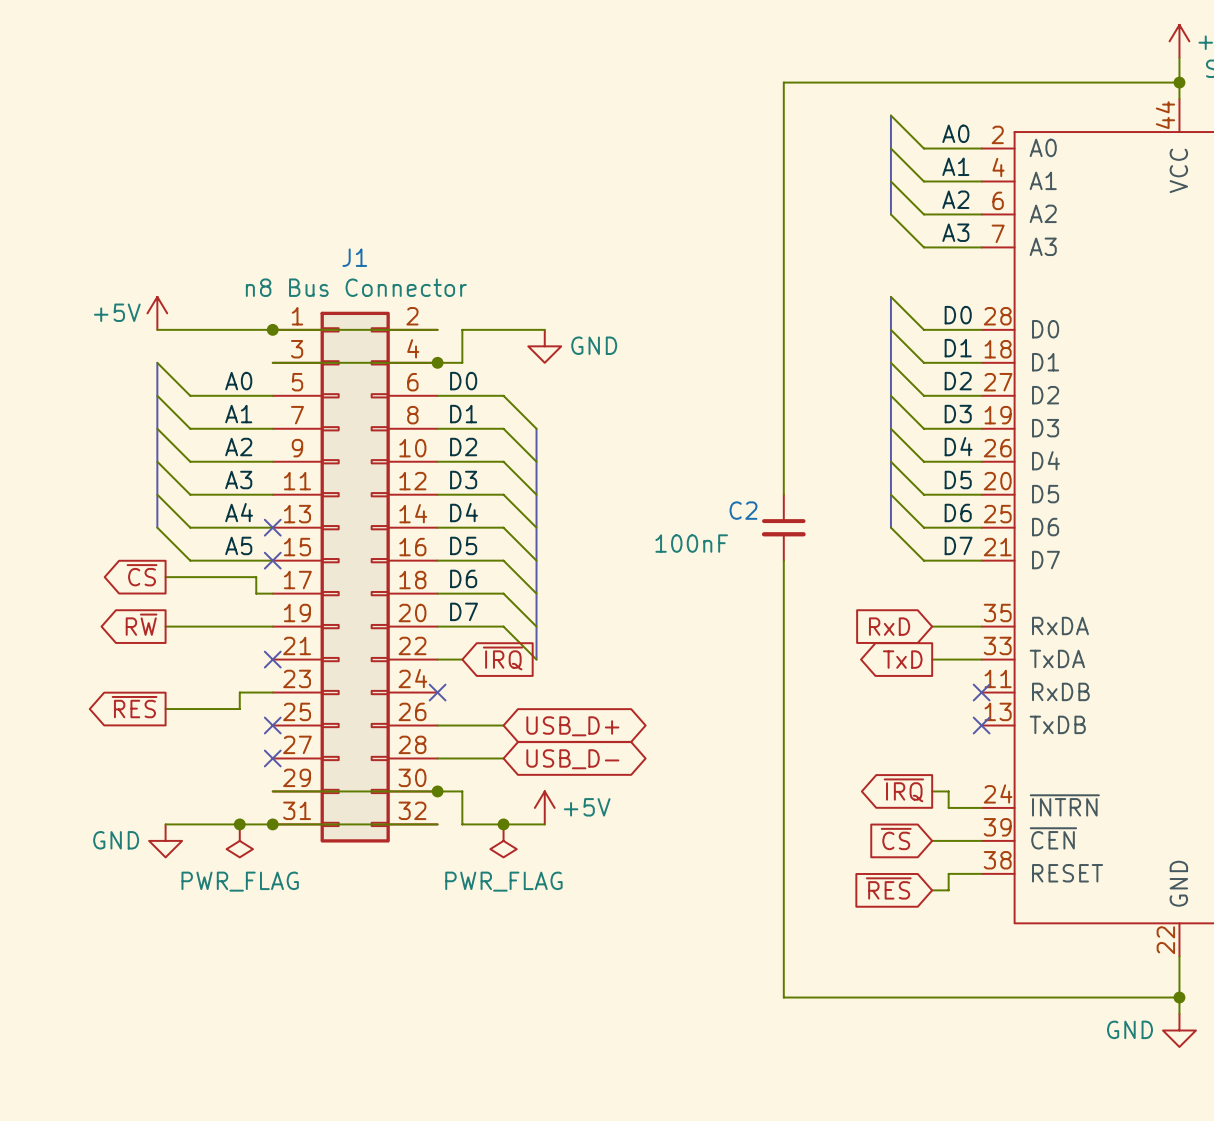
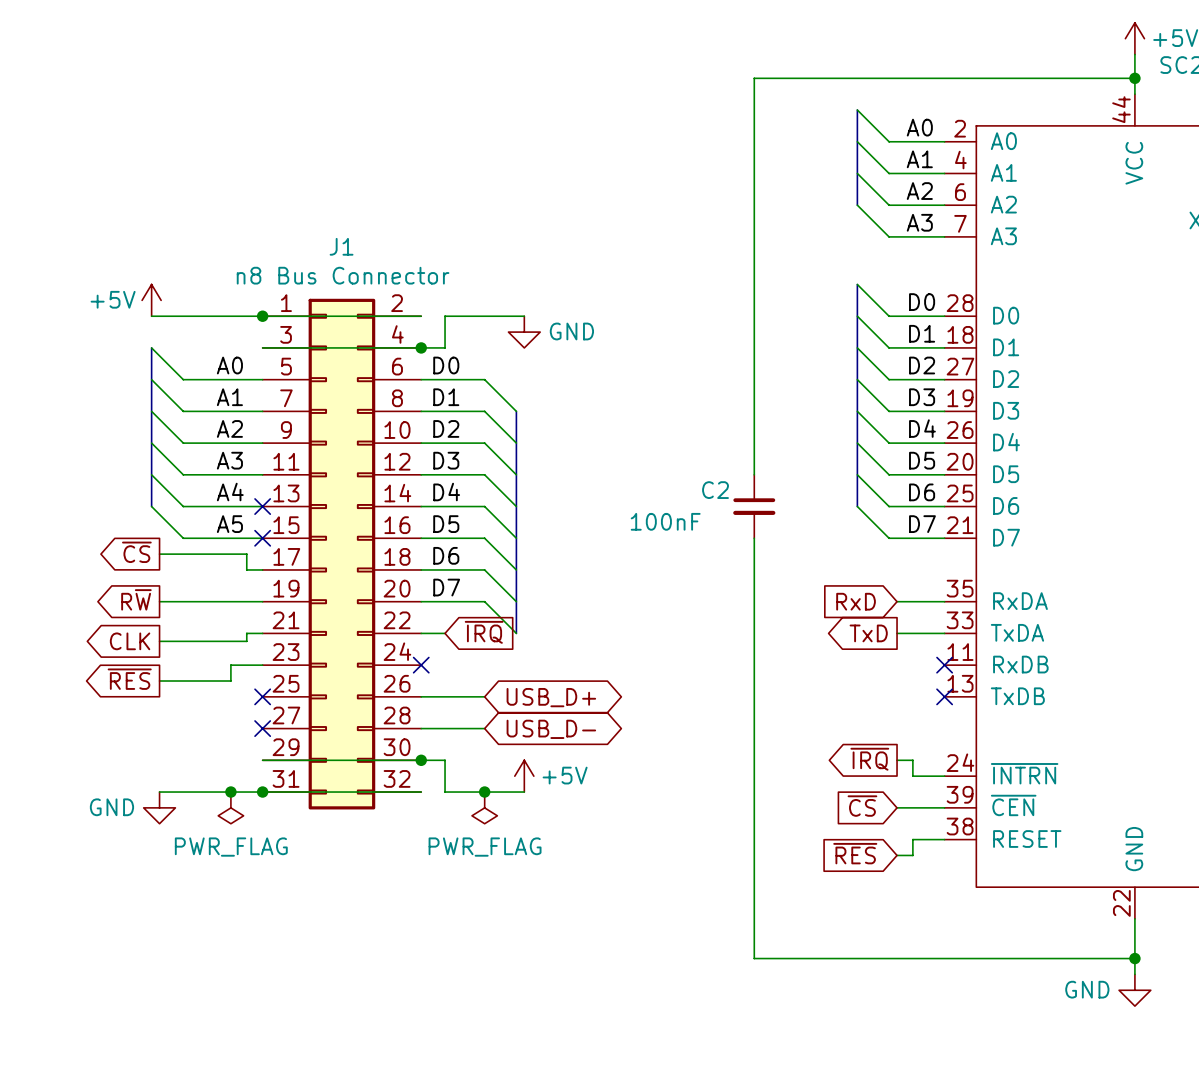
wire: none -> (262, 633) (246, 633) (246, 641) (159, 641)
no-connect mark: (272, 659) -> none
global label: none -> CLK (130, 641)

